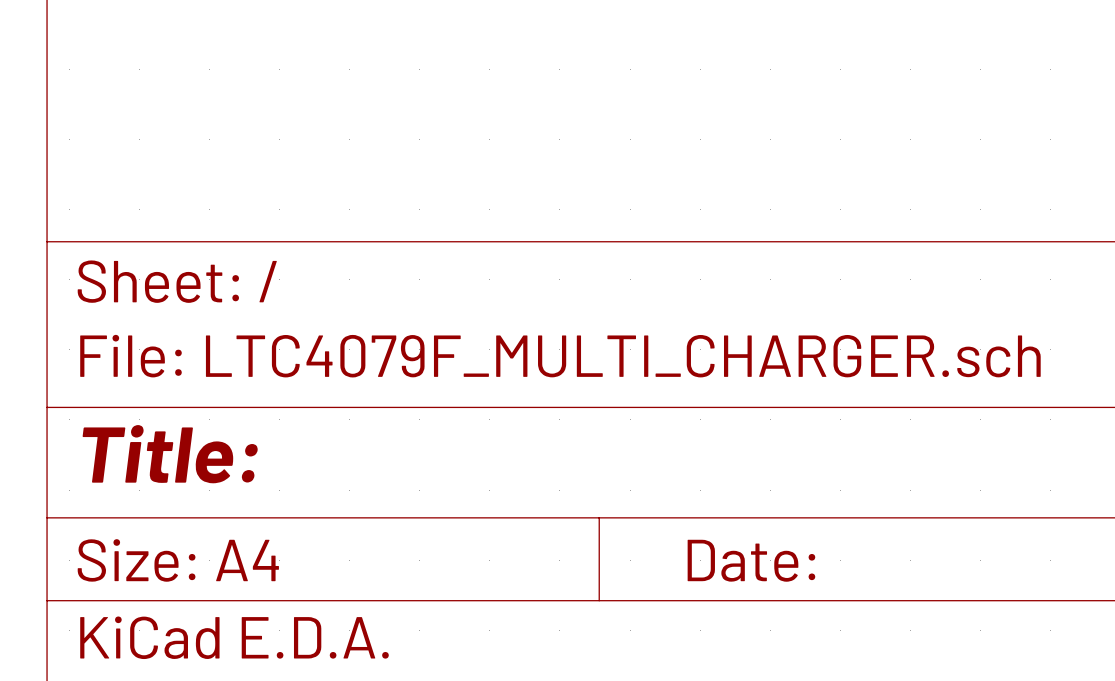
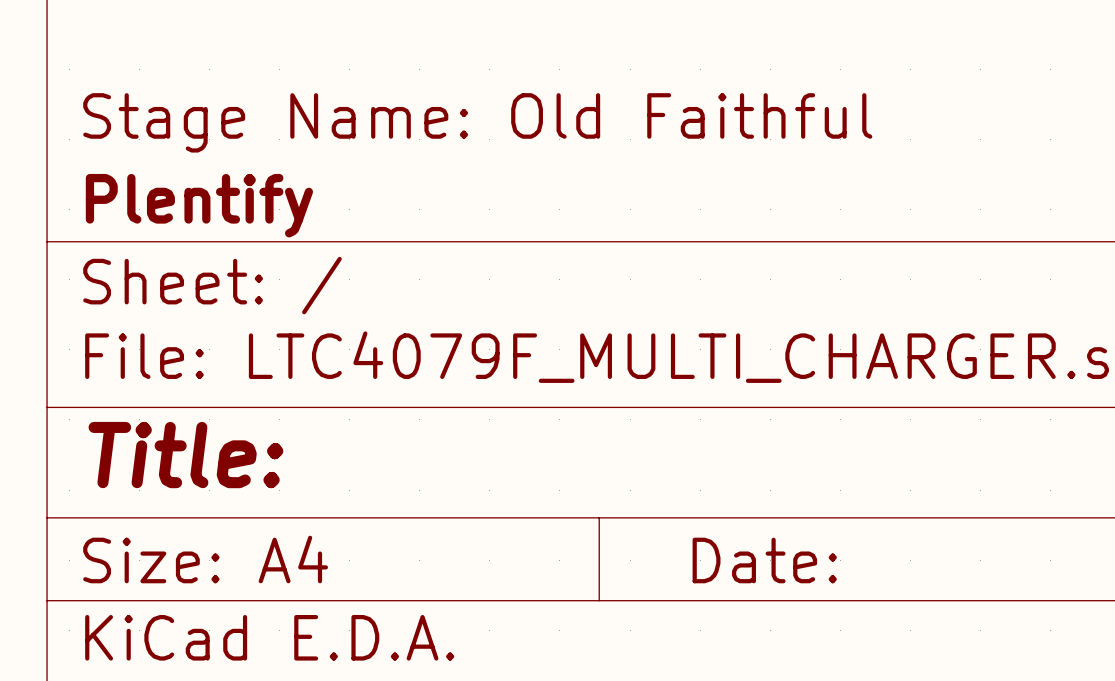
title block: none -> Stage Name: Old Faithful (477, 122)
title block: none -> Plentify (199, 205)

